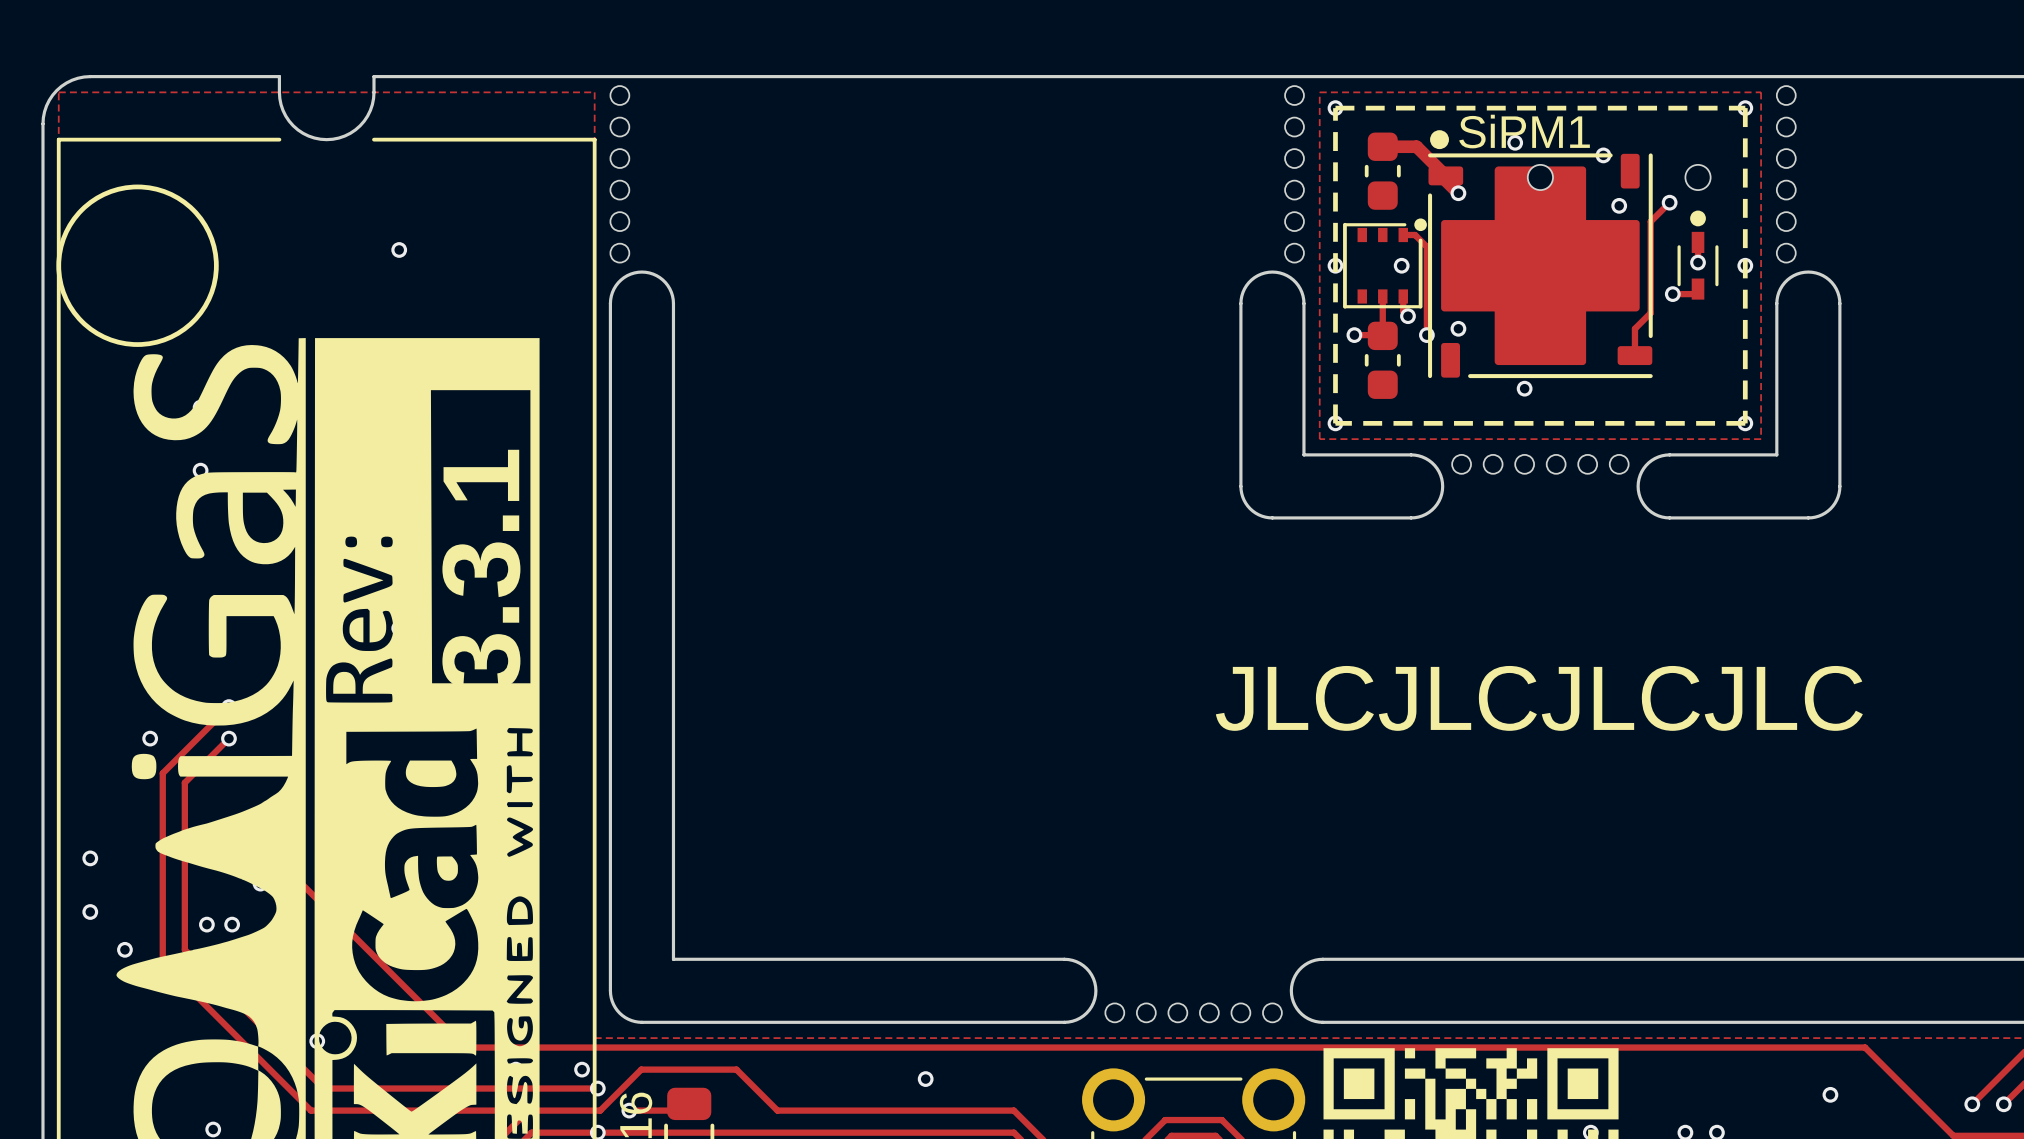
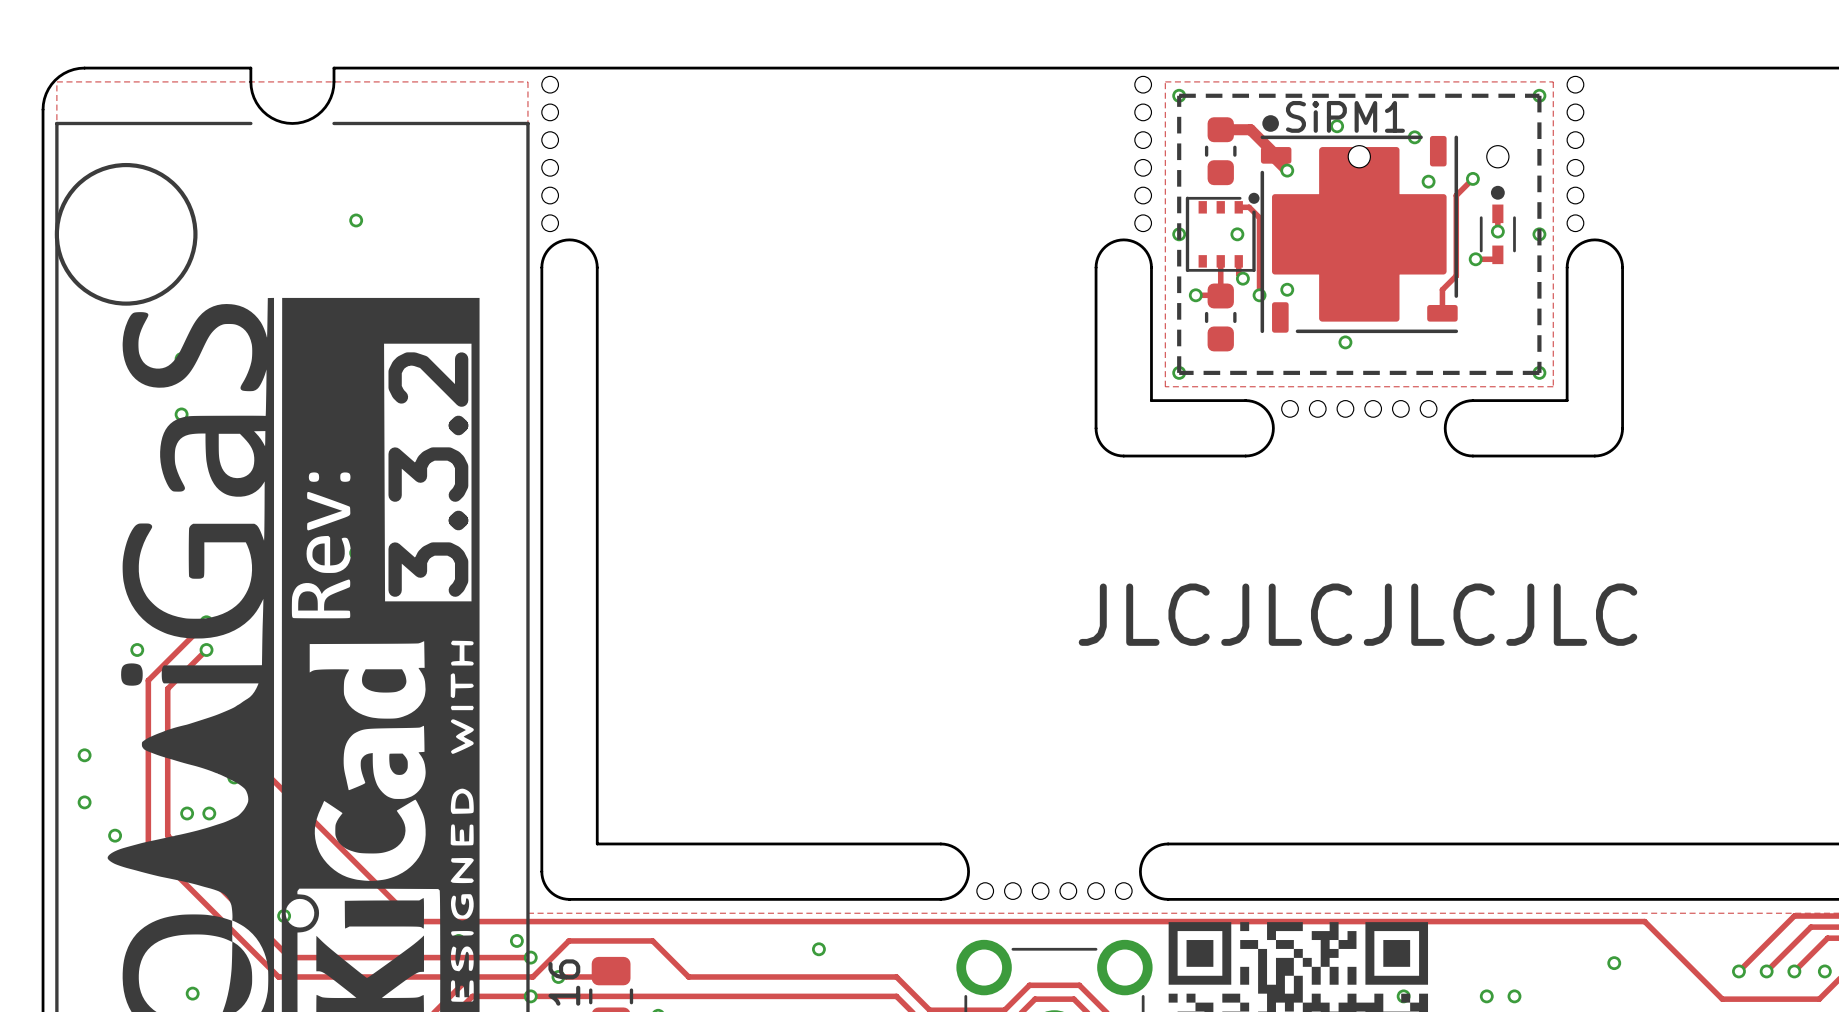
text: 3.3.1 (481, 569) -> 3.3.2 (428, 474)

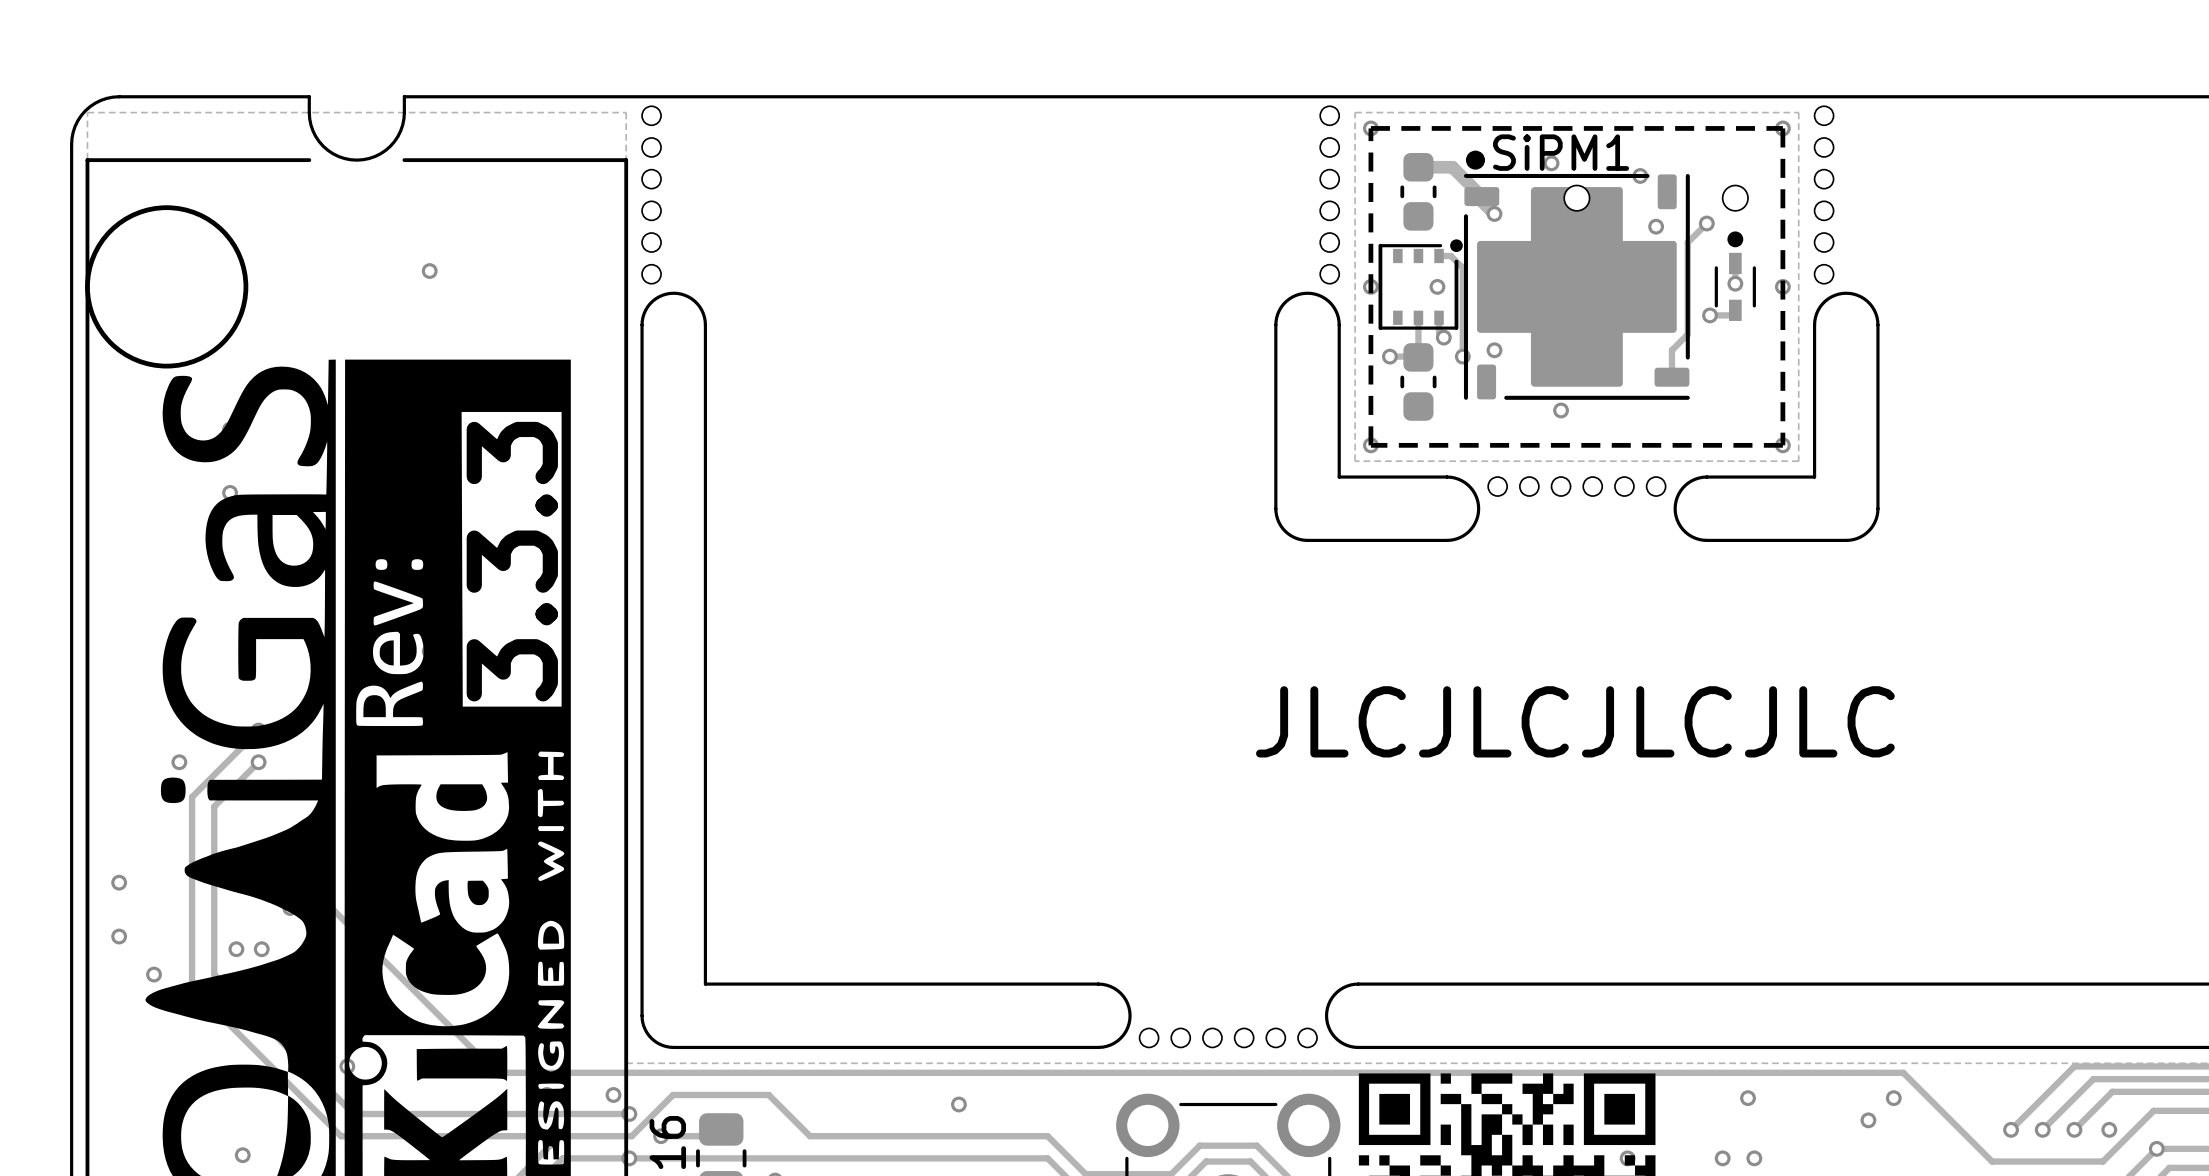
text: 3.3.2 (428, 474) -> 3.3.3 (512, 561)
via: none -> (1748, 1098)
via: none -> (1893, 1098)

